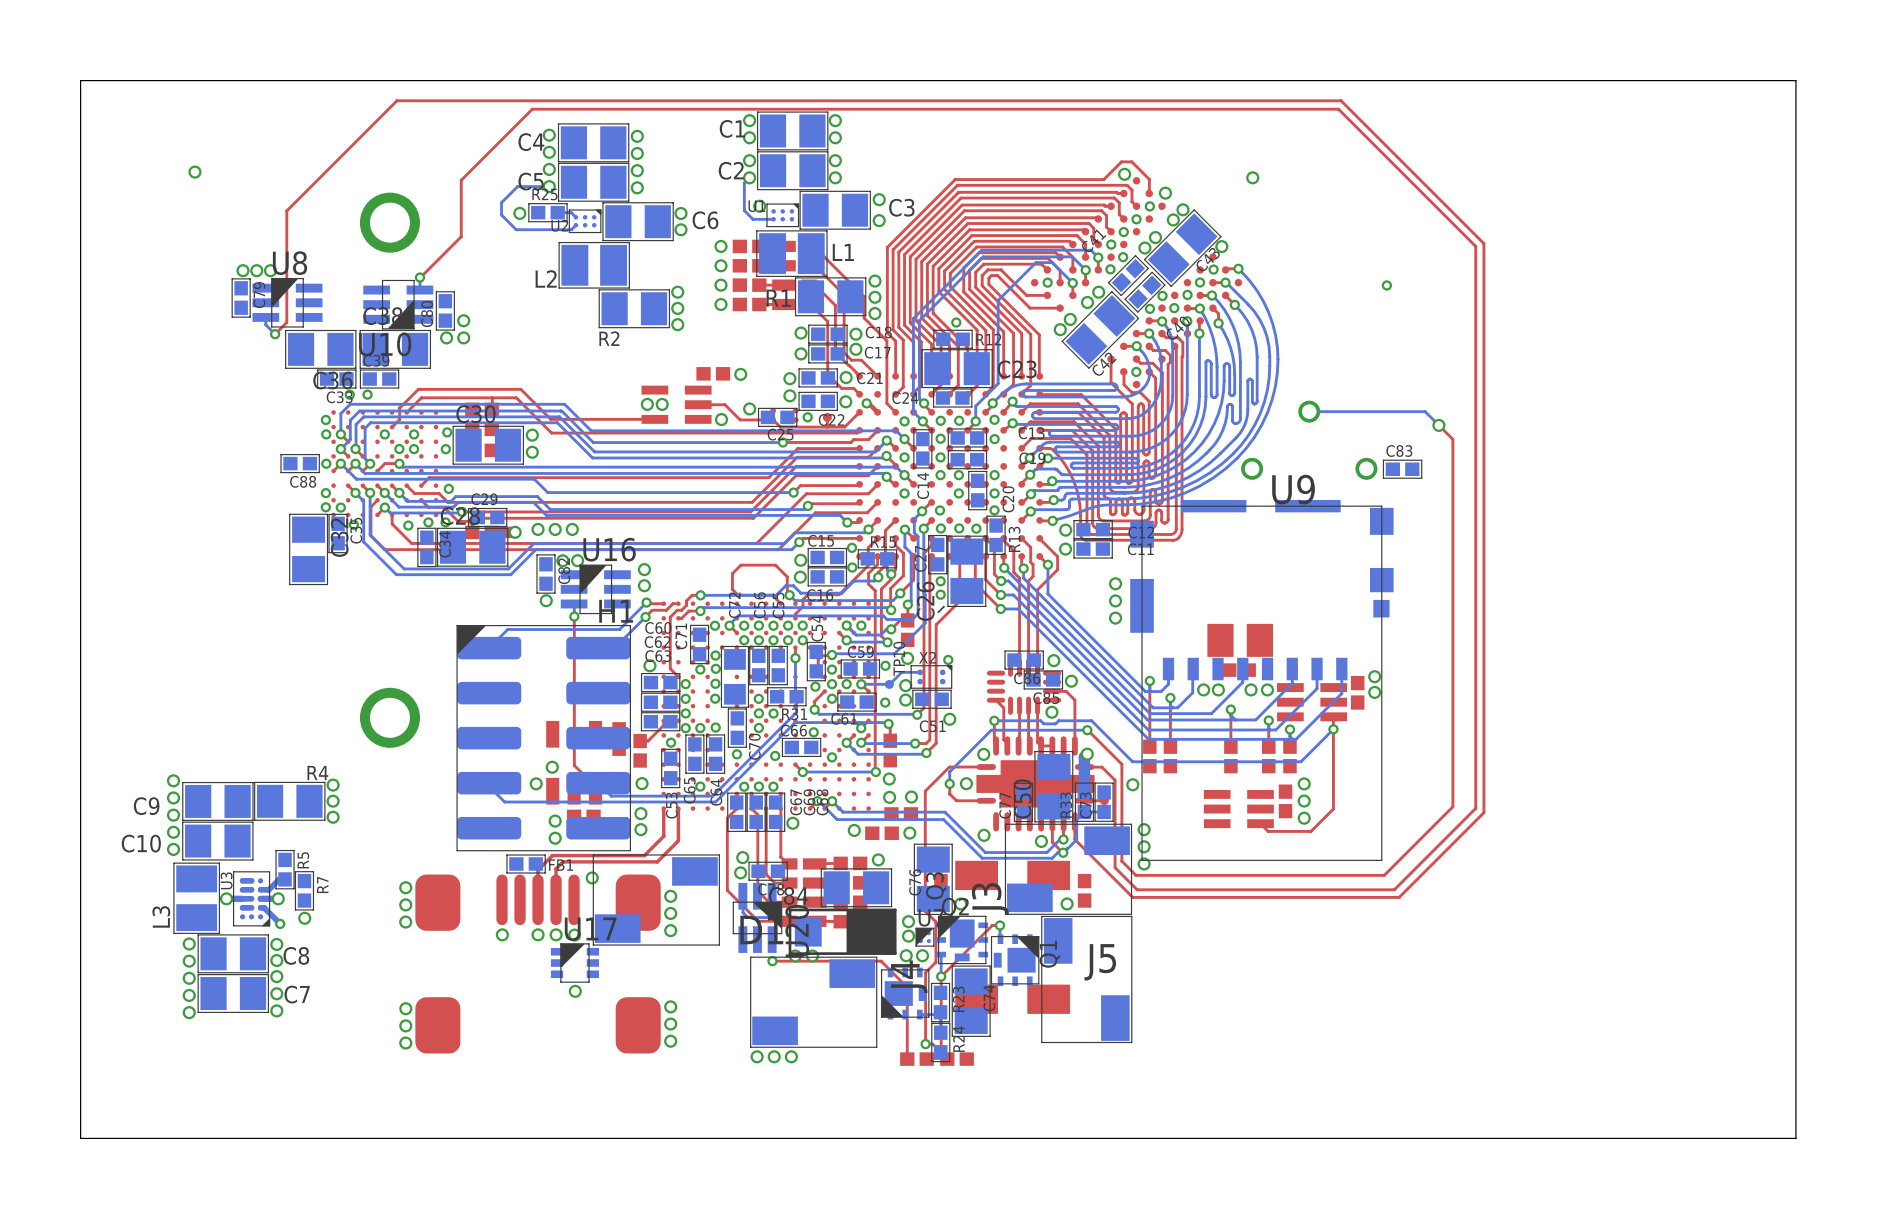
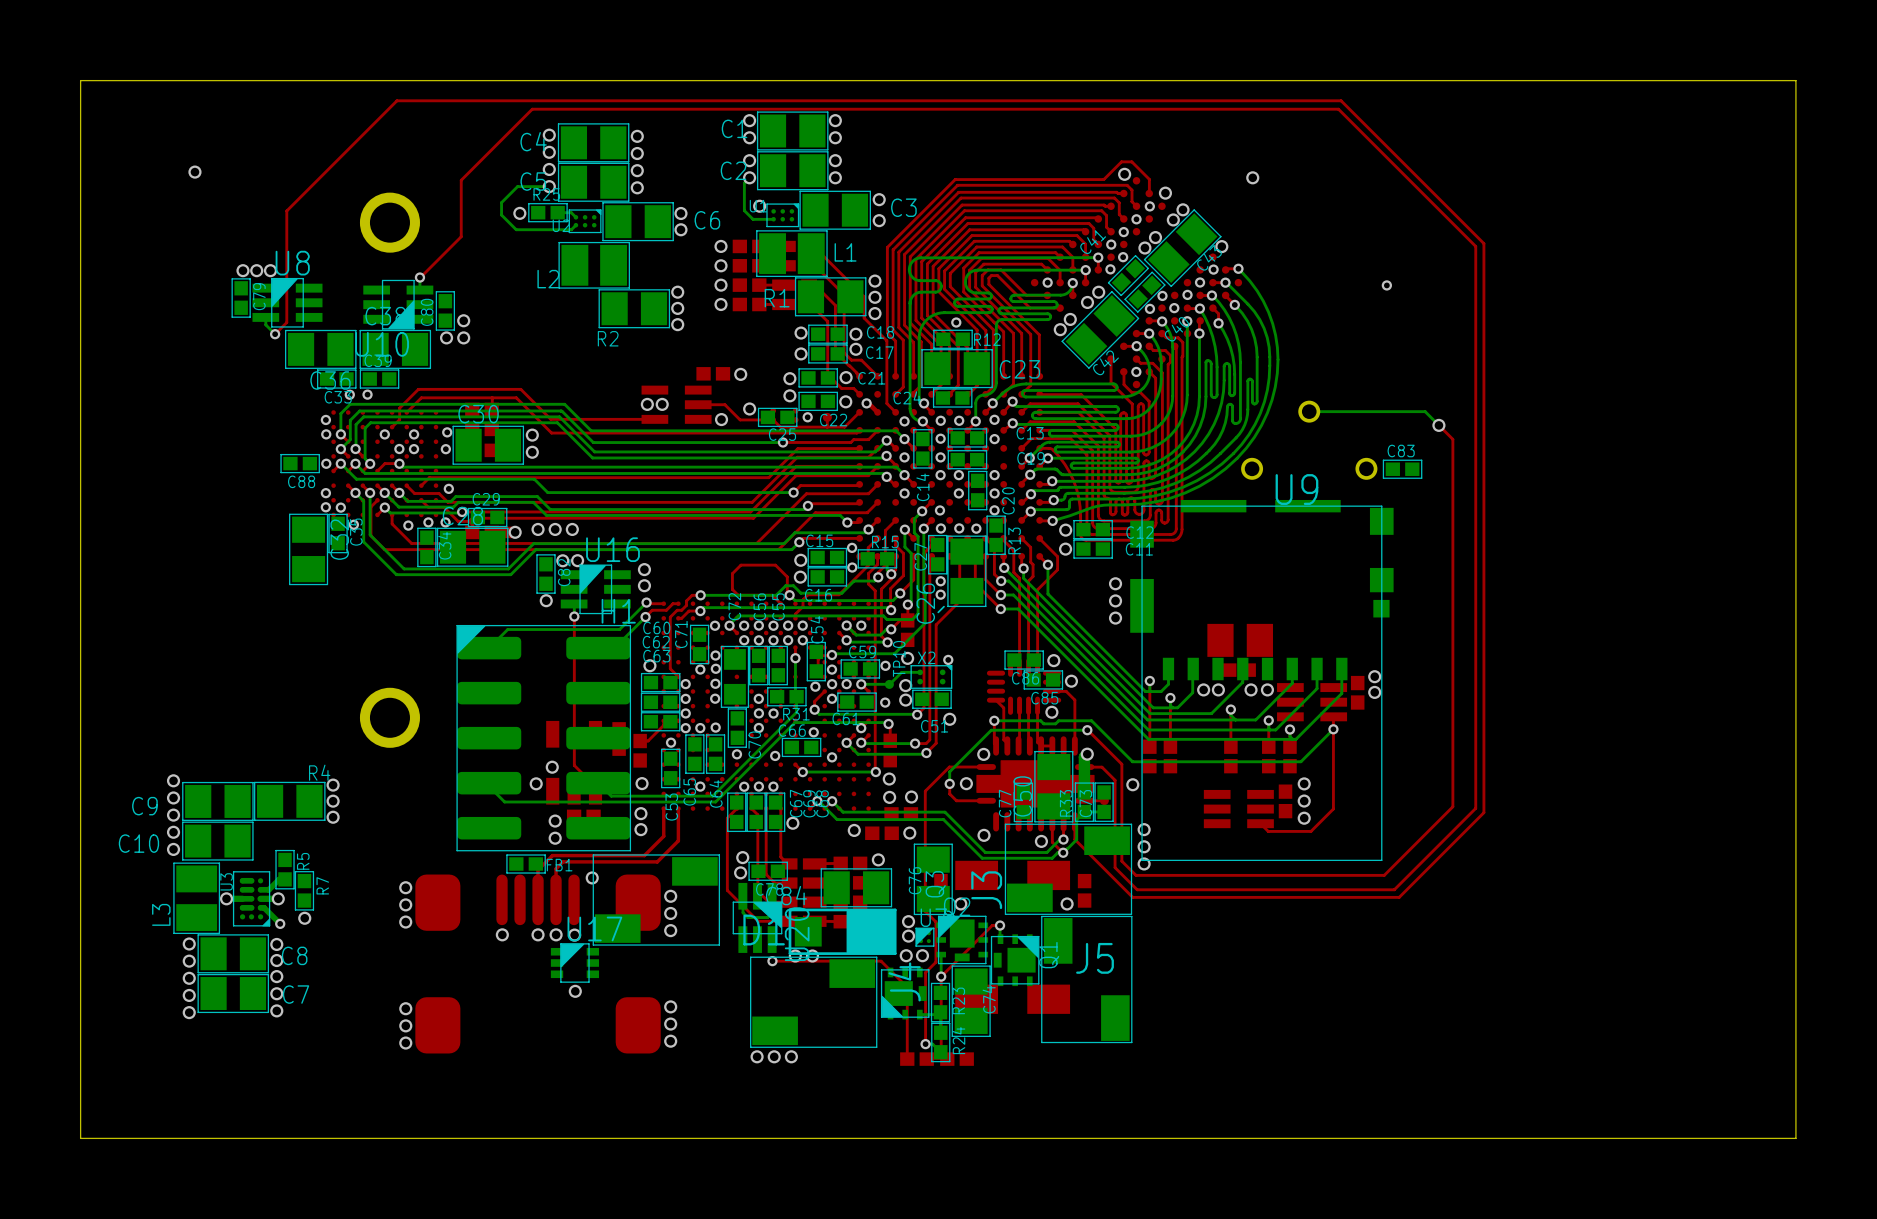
bottom track: (1098, 257) (1090, 250) (981, 250) (913, 318) (913, 411) (922, 421) -> (1098, 257) (918, 258) (910, 265) (909, 271) (911, 276) (918, 280) (937, 281) (941, 287) (937, 291) (915, 293) (911, 297) (910, 303)
bottom track: (1085, 270) (1072, 256) (983, 256) (919, 320) (919, 398) (924, 403) -> (1085, 270) (977, 270) (970, 272) (965, 280) (967, 288) (973, 292) (989, 293) (991, 297) (988, 299) (957, 299) (955, 304) (958, 306) (989, 306) (991, 310) (988, 312) (941, 312) (931, 316) (924, 322) (919, 337) (919, 399) (924, 403)
bottom track: (1072, 283) (1052, 262) (1036, 262) (998, 300) (998, 383) (975, 406) -> (1072, 283) (1070, 290) (1063, 294) (1014, 295) (1010, 297) (1013, 301) (1054, 301) (1057, 304) (1055, 307) (999, 309) (1001, 313) (1048, 313) (1050, 317) (1048, 319) (1002, 319) (997, 321) (995, 385) (990, 393) (978, 397) (975, 406)
bottom track: none -> (910, 301) (910, 410) (915, 418) (922, 421)

